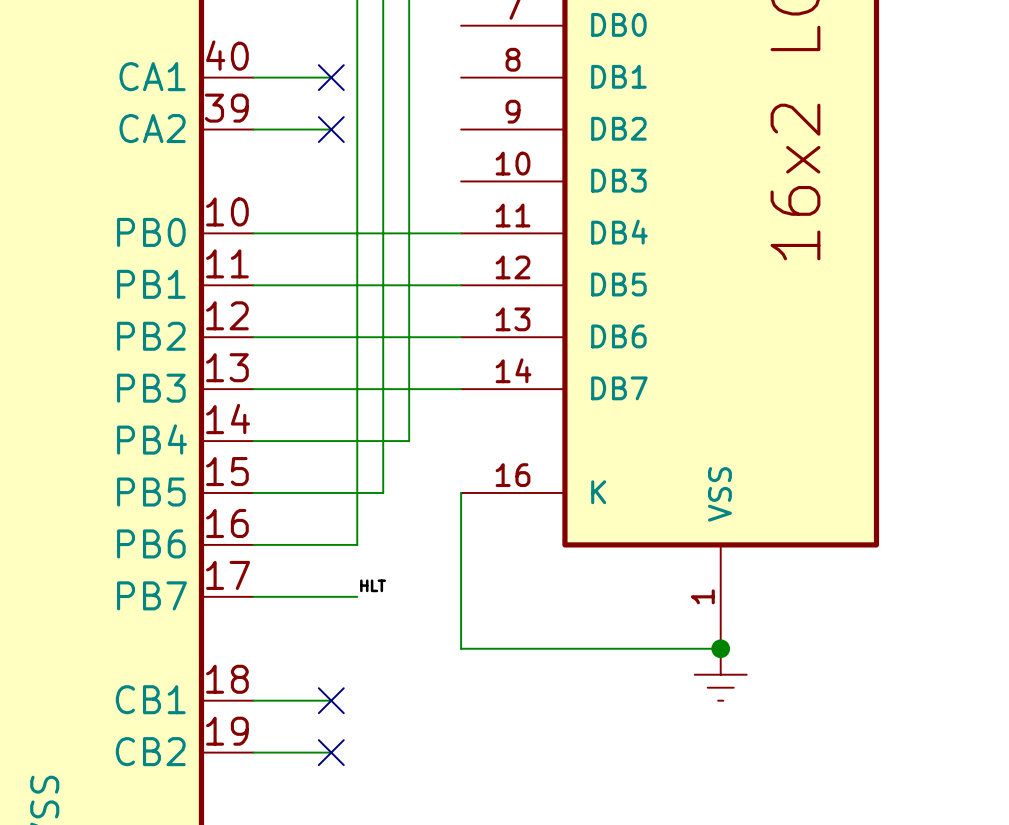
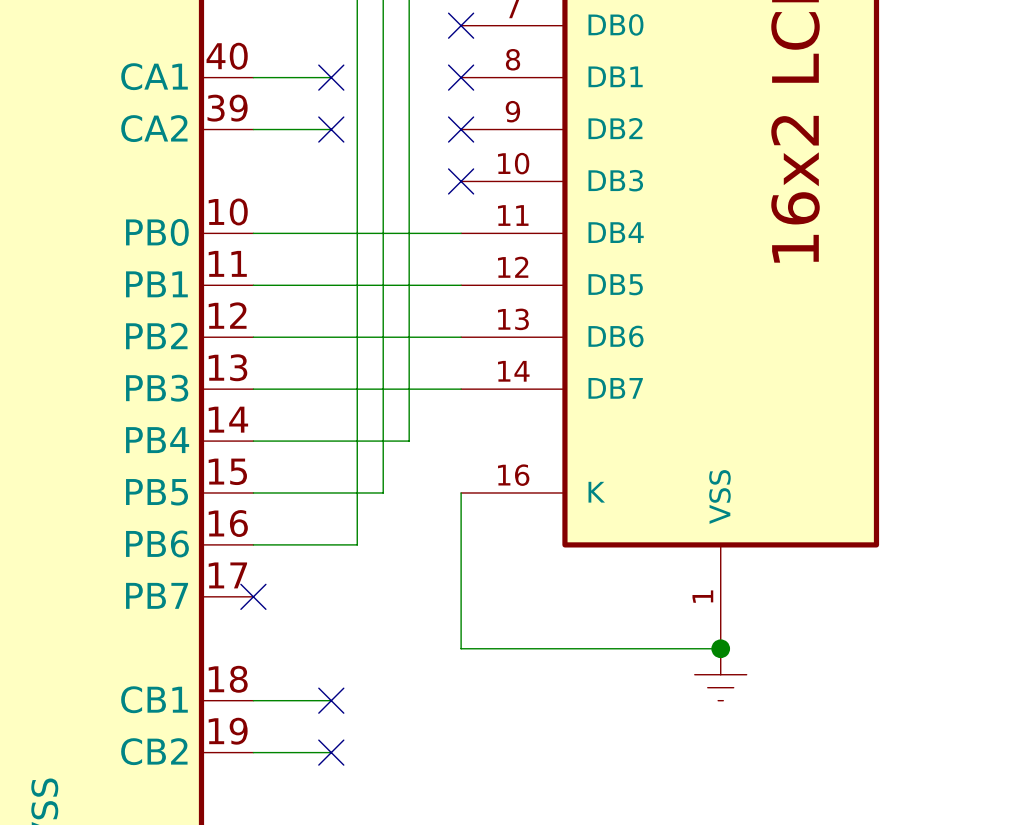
no-connect mark: none -> (461, 25)
no-connect mark: none -> (461, 77)
no-connect mark: none -> (461, 129)
no-connect mark: none -> (461, 181)
label: HLT (373, 585) -> none
wire: (253, 596) (357, 596) -> none
no-connect mark: none -> (253, 596)

